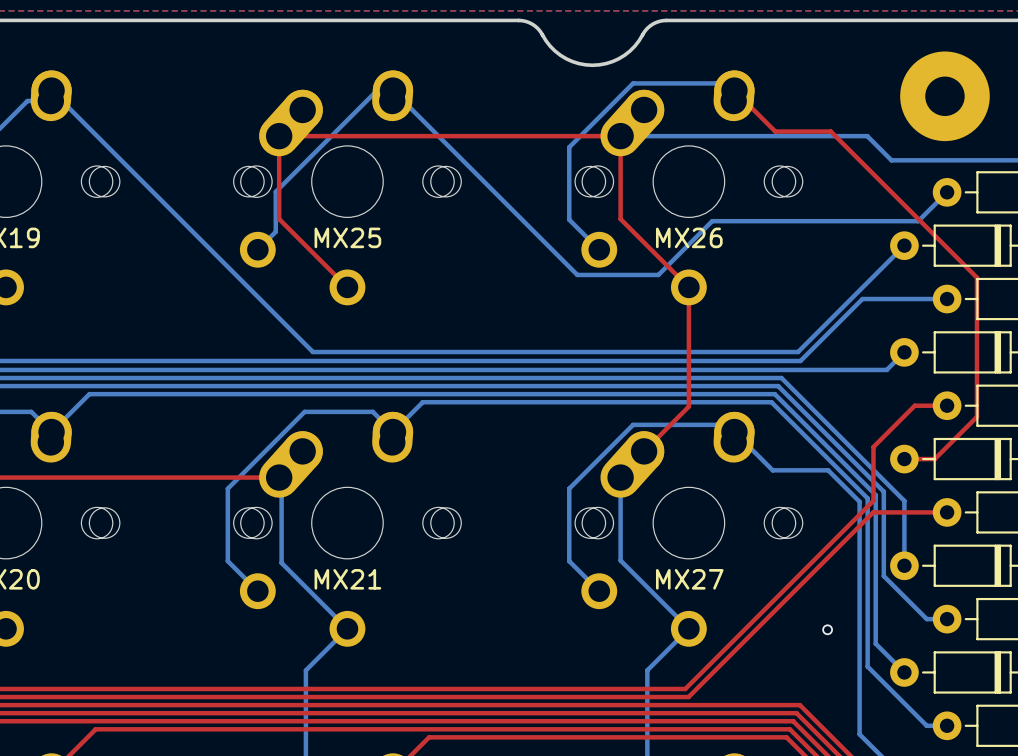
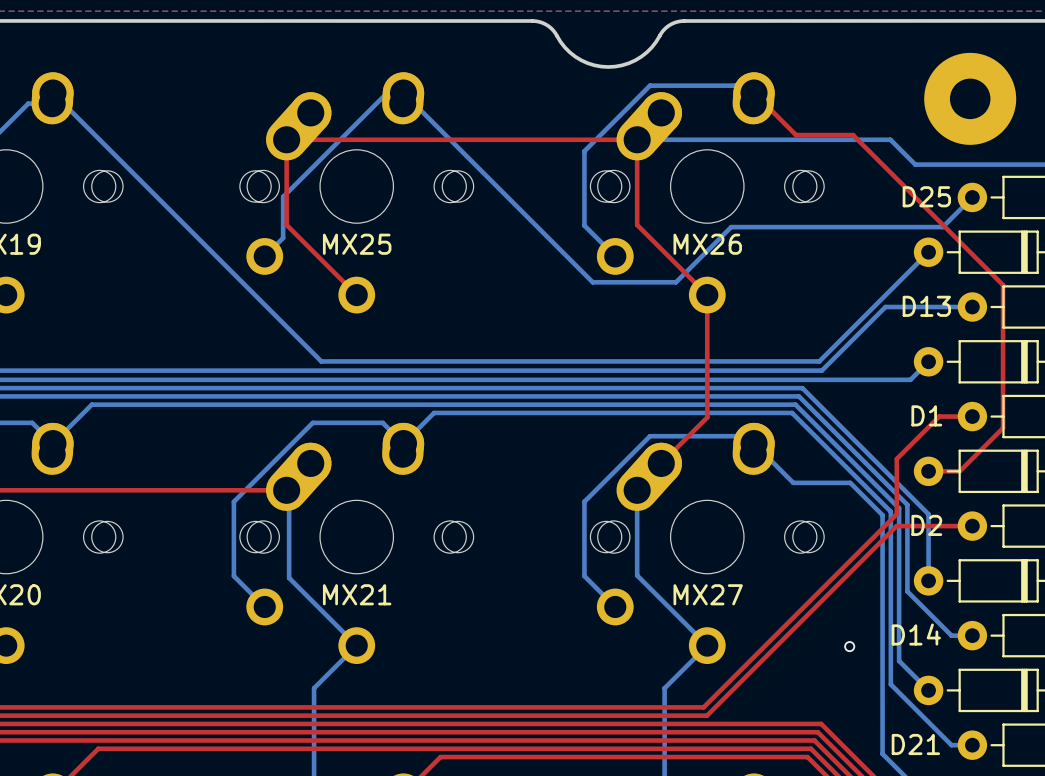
D25 name: none -> D25 (926, 196)
D13 name: none -> D13 (926, 306)
D1 name: none -> D1 (926, 415)
D2 name: none -> D2 (926, 525)
D14 name: none -> D14 (916, 634)
D21 name: none -> D21 (915, 744)

